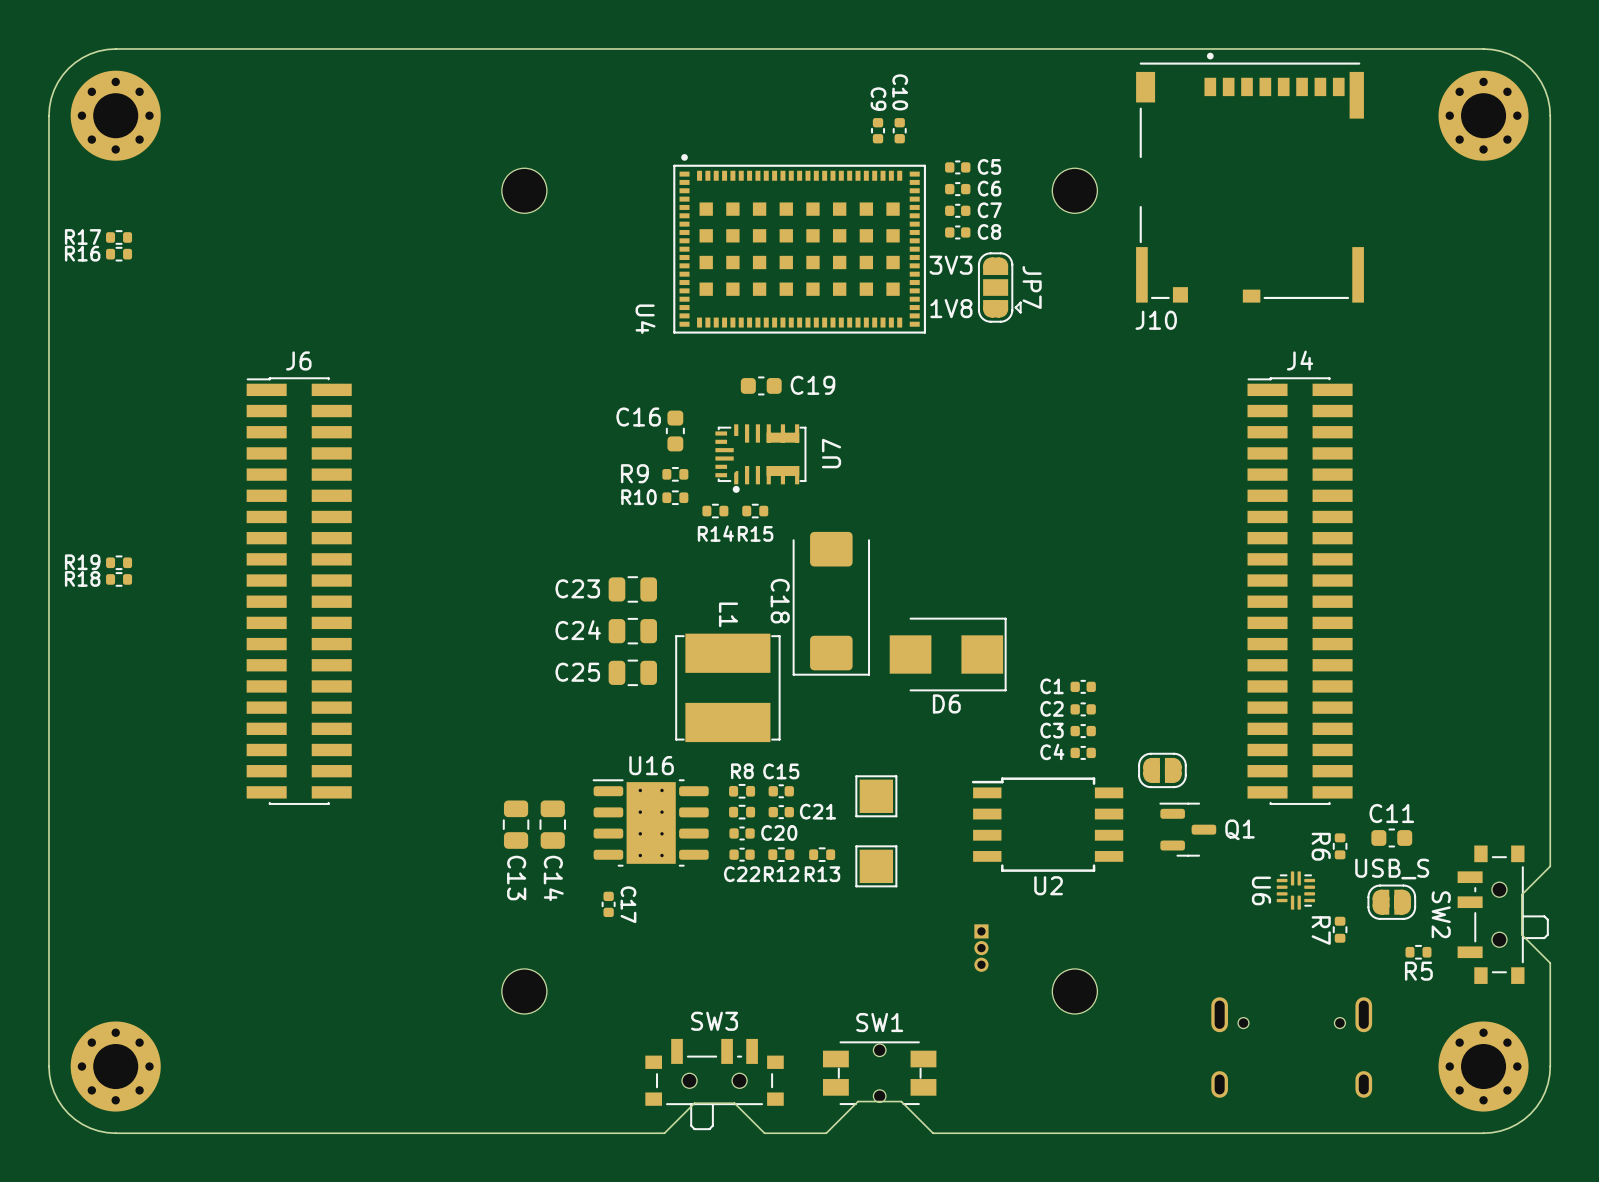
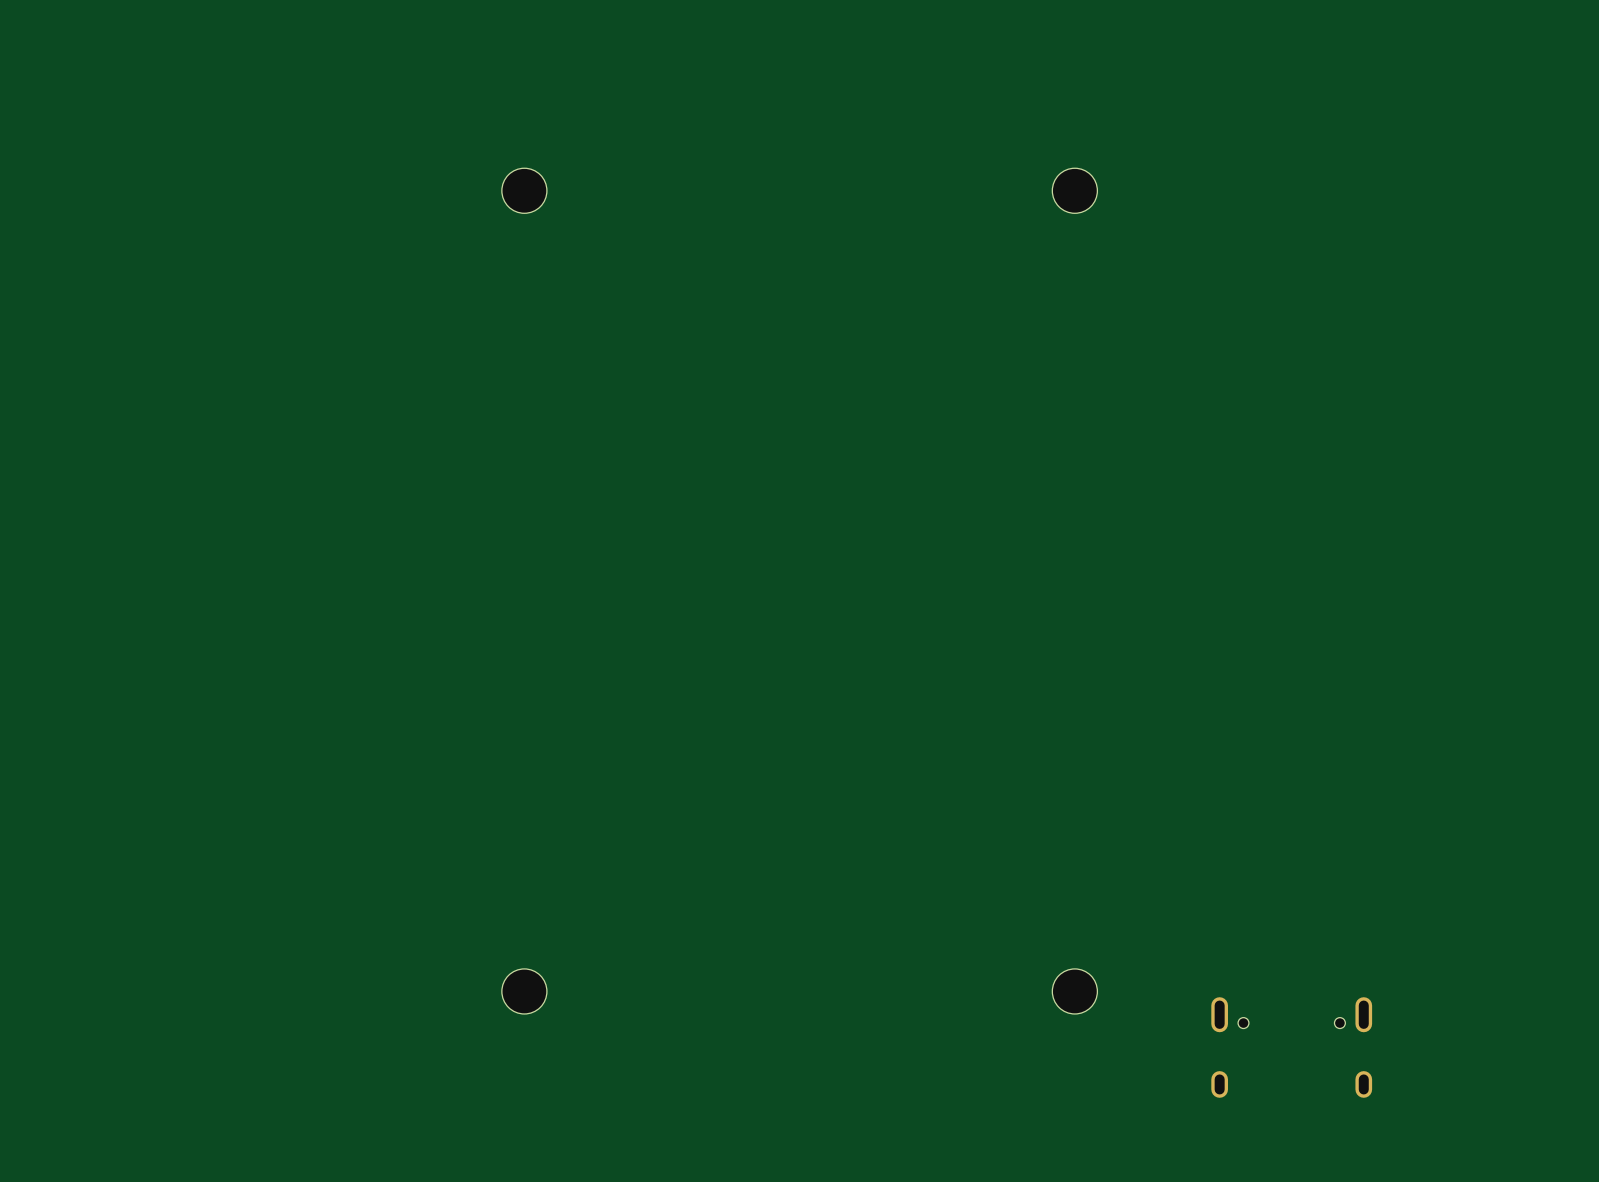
board edge: (1483, 48) (115, 48) (98, 51) (75, 62) (57, 82) (51, 98) (48, 115) (48, 1066) (54, 1092) (62, 1107) (82, 1124) (98, 1130) (115, 1133) (664, 1133) (694, 1103) (734, 1103) (764, 1133) (826, 1133) (858, 1101) (901, 1101) (933, 1133) (1483, 1133) (1509, 1128) (1524, 1119) (1536, 1107) (1545, 1092) (1550, 1066) (1550, 963) (1521, 934) (1521, 894) (1550, 866) (1550, 115) (1545, 90) (1530, 68) (1509, 54) (1483, 48) -> none
part: (115, 115) -> none
part: (1483, 115) -> none
C9: (878, 130) -> none
C10: (899, 130) -> none
C5: (957, 167) -> none
J10: (1250, 177) -> none
C6: (957, 189) -> none
C7: (957, 210) -> none
C8: (957, 232) -> none
R17: (119, 237) -> none
U4: (799, 243) -> none
R16: (119, 254) -> none
text: 3V3 (951, 265) -> none
JP7: (999, 287) -> none
text: 1V8 (951, 308) -> none
C19: (761, 385) -> none
C16: (675, 430) -> none
U7: (760, 458) -> none
R9: (675, 474) -> none
R10: (675, 497) -> none
R14: (715, 511) -> none
R15: (755, 511) -> none
R19: (119, 562) -> none
R18: (119, 579) -> none
C23: (632, 589) -> none
J6: (299, 591) -> none
J4: (1300, 591) -> none
C18: (831, 603) -> none
C24: (632, 631) -> none
D6: (948, 654) -> none
C25: (632, 672) -> none
C1: (1083, 686) -> none
L1: (727, 687) -> none
C2: (1083, 709) -> none
C3: (1083, 731) -> none
C4: (1083, 752) -> none
part: (1162, 770) -> none
R8: (742, 791) -> none
C15: (781, 791) -> none
part: (876, 796) -> none
part: (742, 812) -> none
C21: (781, 812) -> none
U16: (650, 822) -> none
C13: (516, 824) -> none
C14: (552, 824) -> none
U2: (1047, 824) -> none
Q1: (1187, 829) -> none
C20: (742, 833) -> none
C11: (1391, 837) -> none
R6: (1340, 846) -> none
C22: (742, 854) -> none
R12: (781, 854) -> none
R13: (822, 854) -> none
part: (876, 866) -> none
text: USB_S (1392, 869) -> none
U6: (1295, 890) -> none
part: (1391, 902) -> none
C17: (608, 904) -> none
SW2: (1503, 914) -> none
R7: (1340, 929) -> none
part: (981, 948) -> none
R5: (1418, 952) -> none
part: (115, 1066) -> none
part: (1483, 1066) -> none
SW1: (879, 1073) -> none
SW3: (714, 1084) -> none

